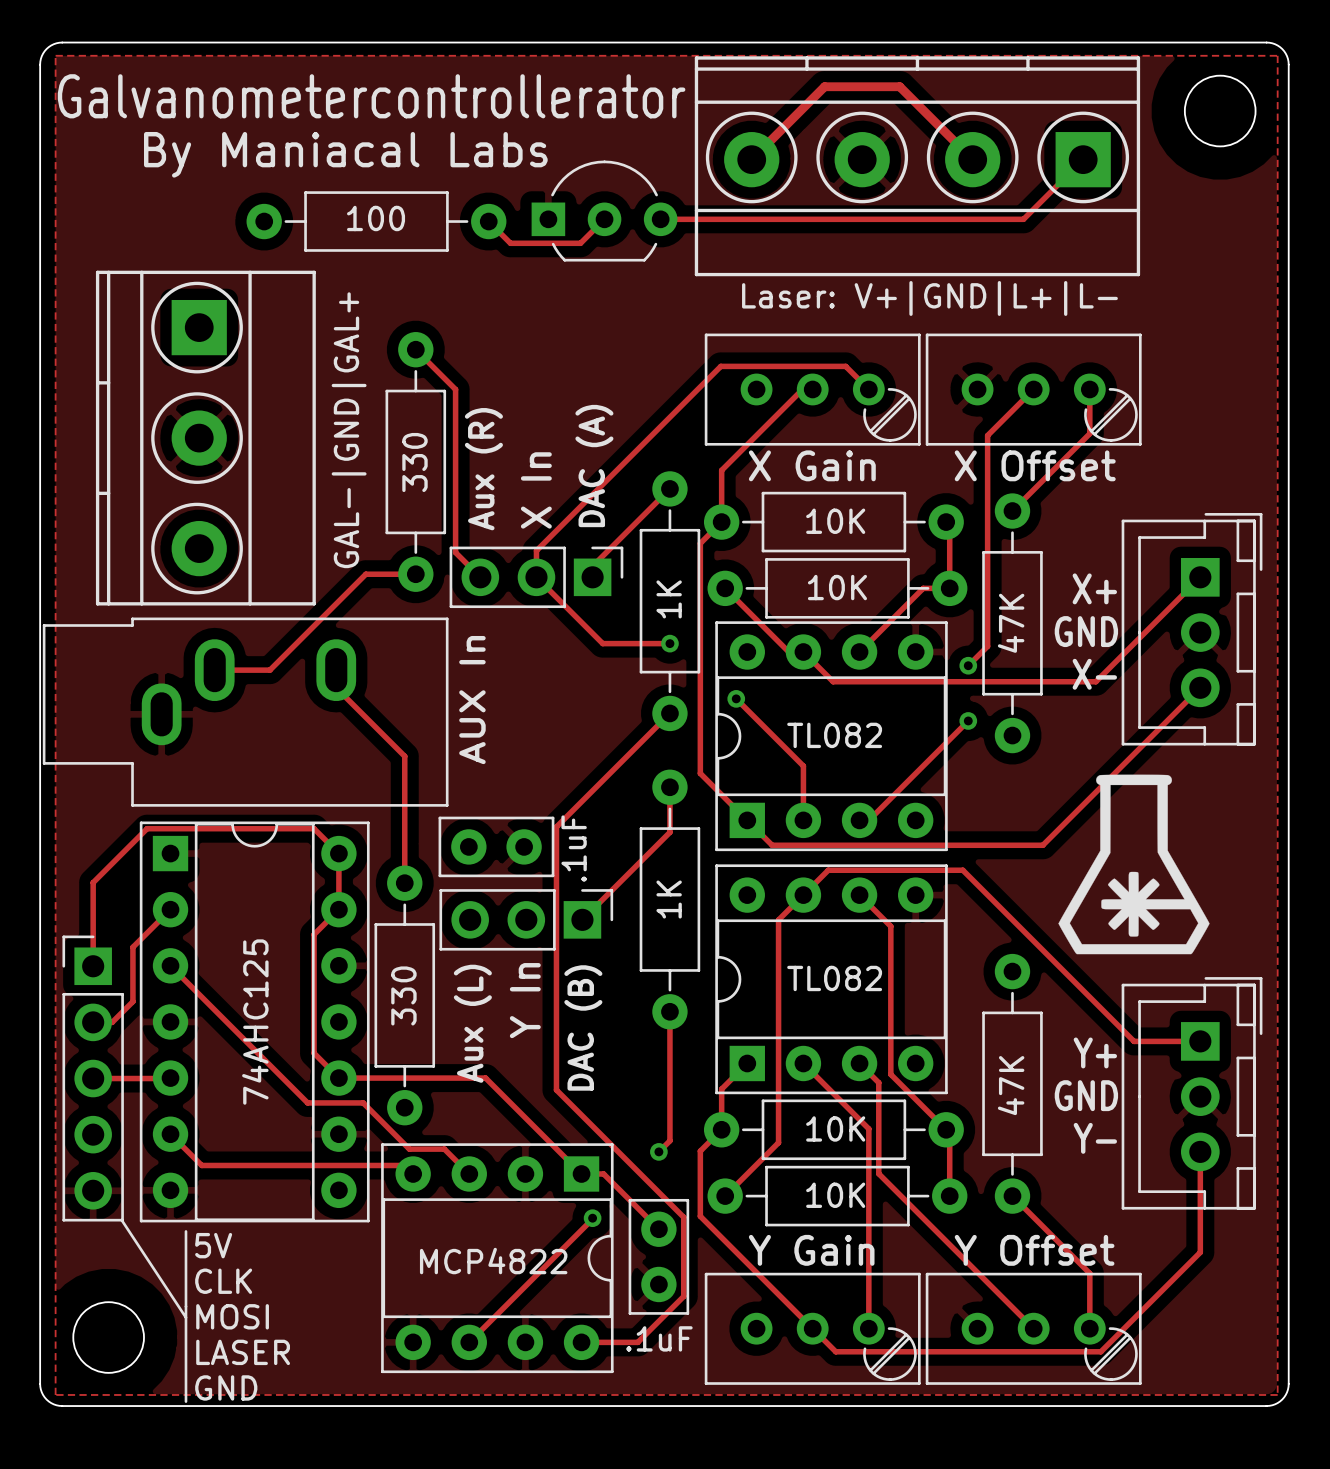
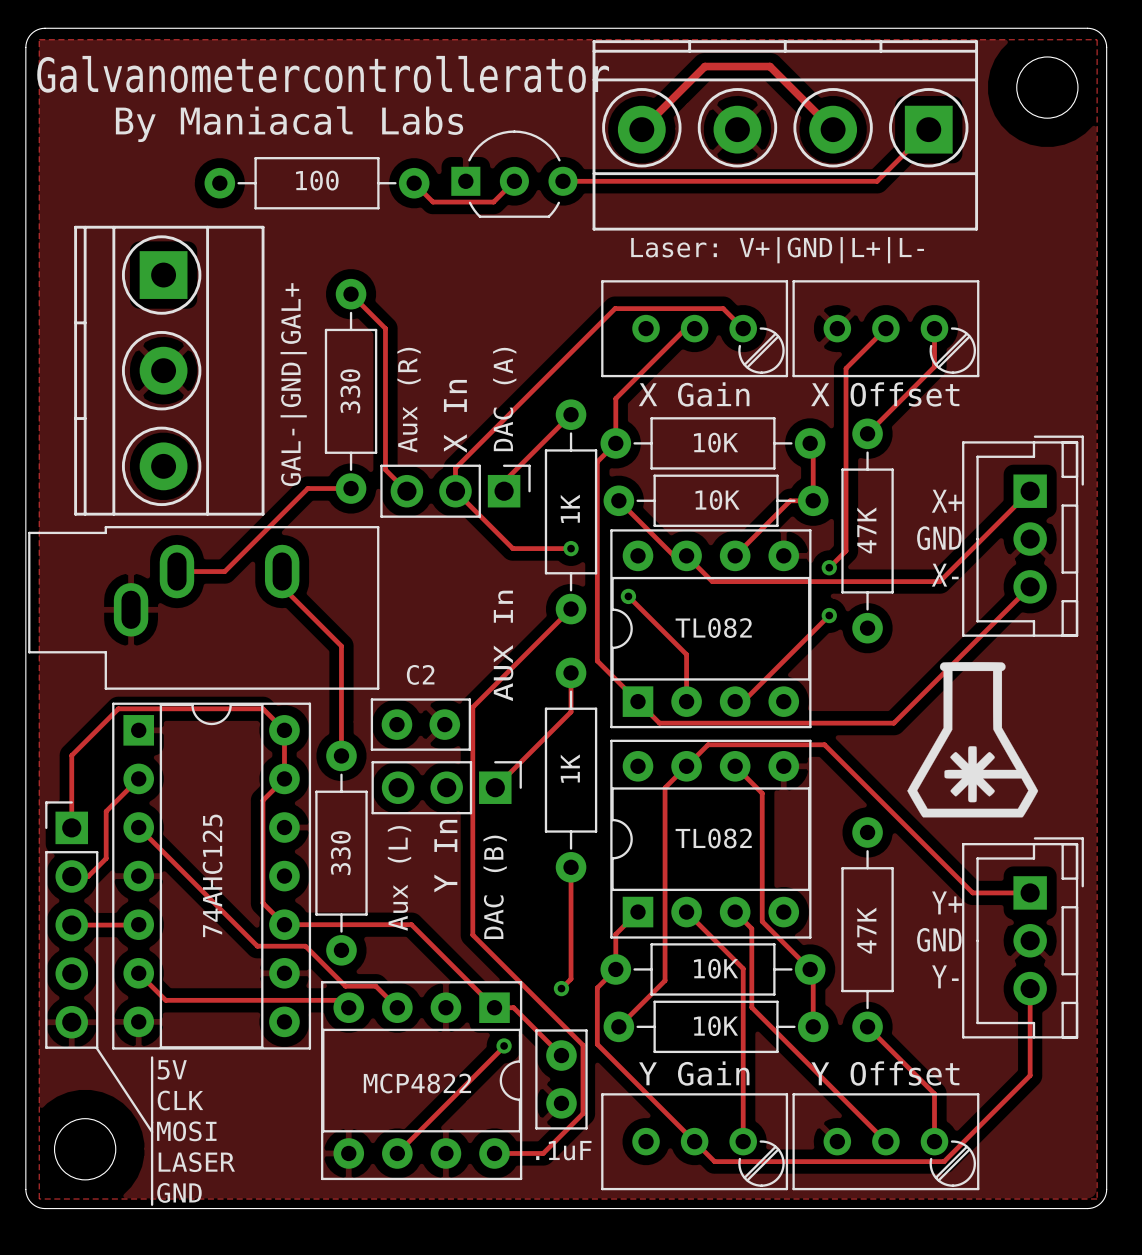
text position: AUX In (472, 700) -> AUX In (503, 645)
C2 name: none -> C2 (420, 674)
C2 value: .1uF (574, 848) -> none

